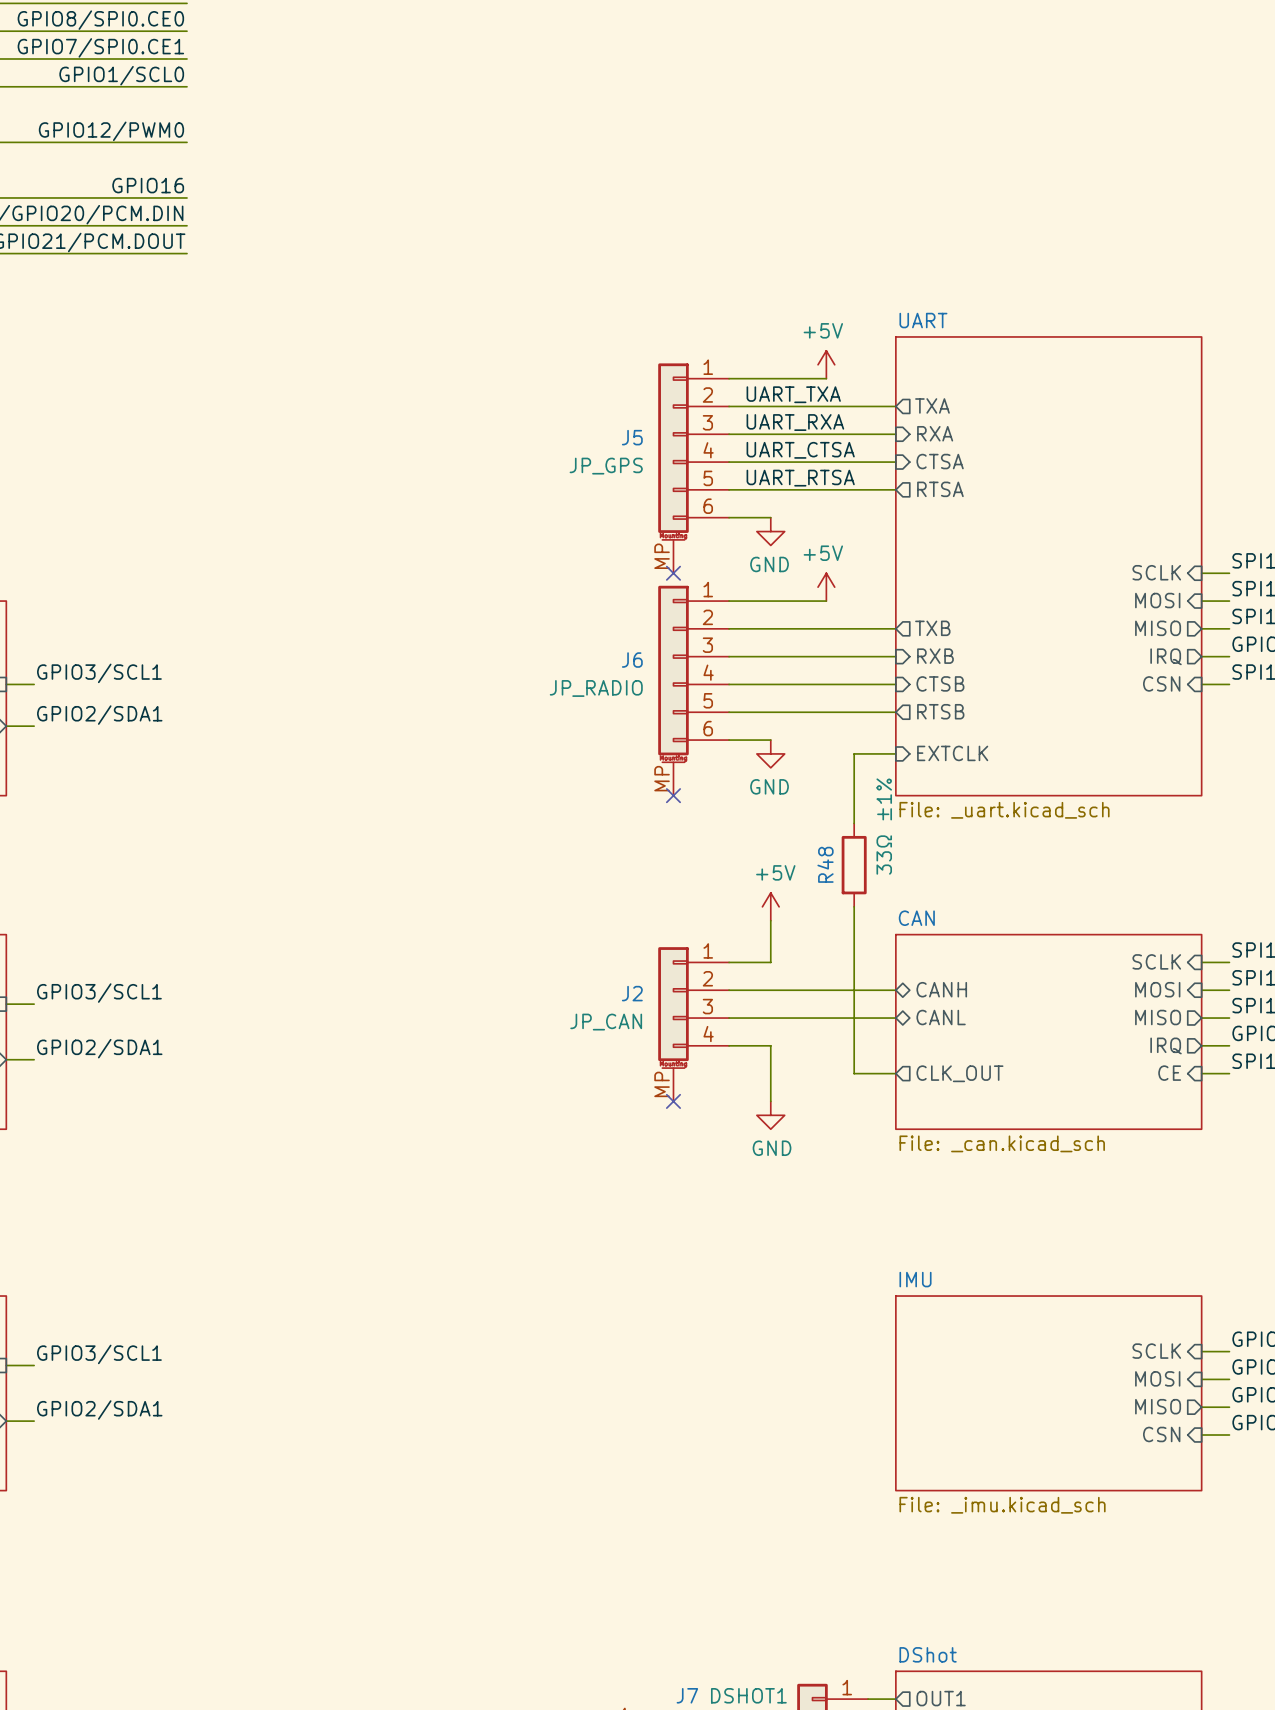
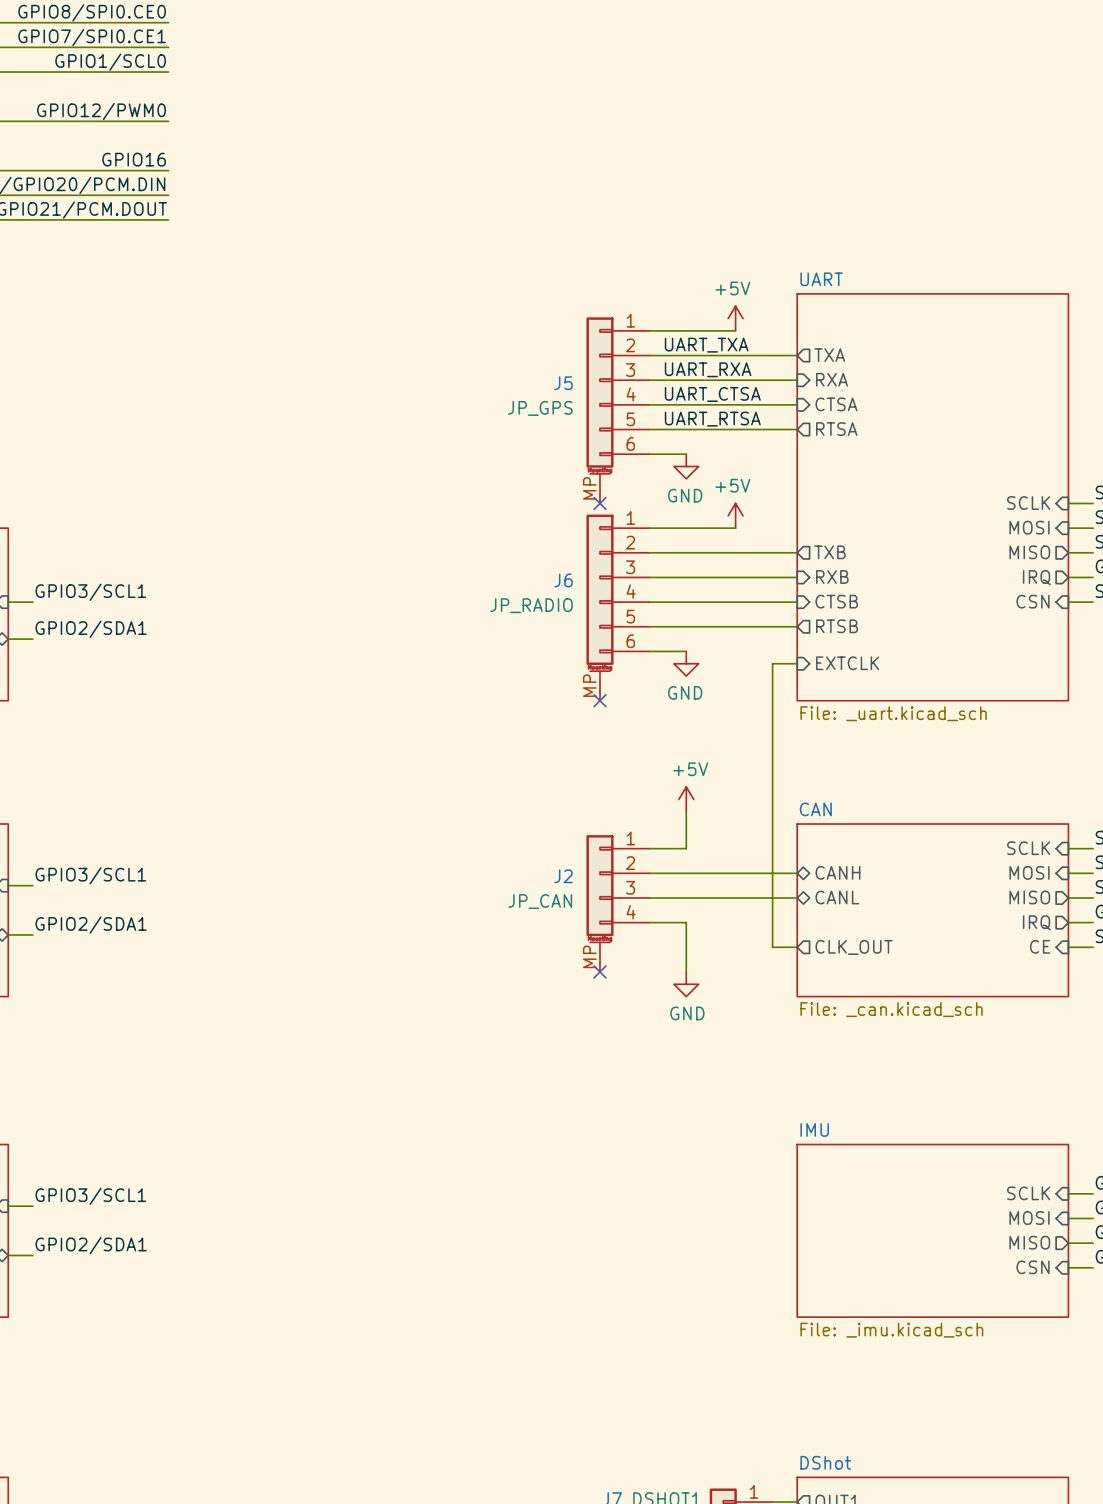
wire: (868, 753) (854, 753) (854, 823) -> none
R48: 33Ω ±1% (854, 865) -> none
wire: (854, 906) (854, 1073) (868, 1073) -> (772, 663) (772, 947)

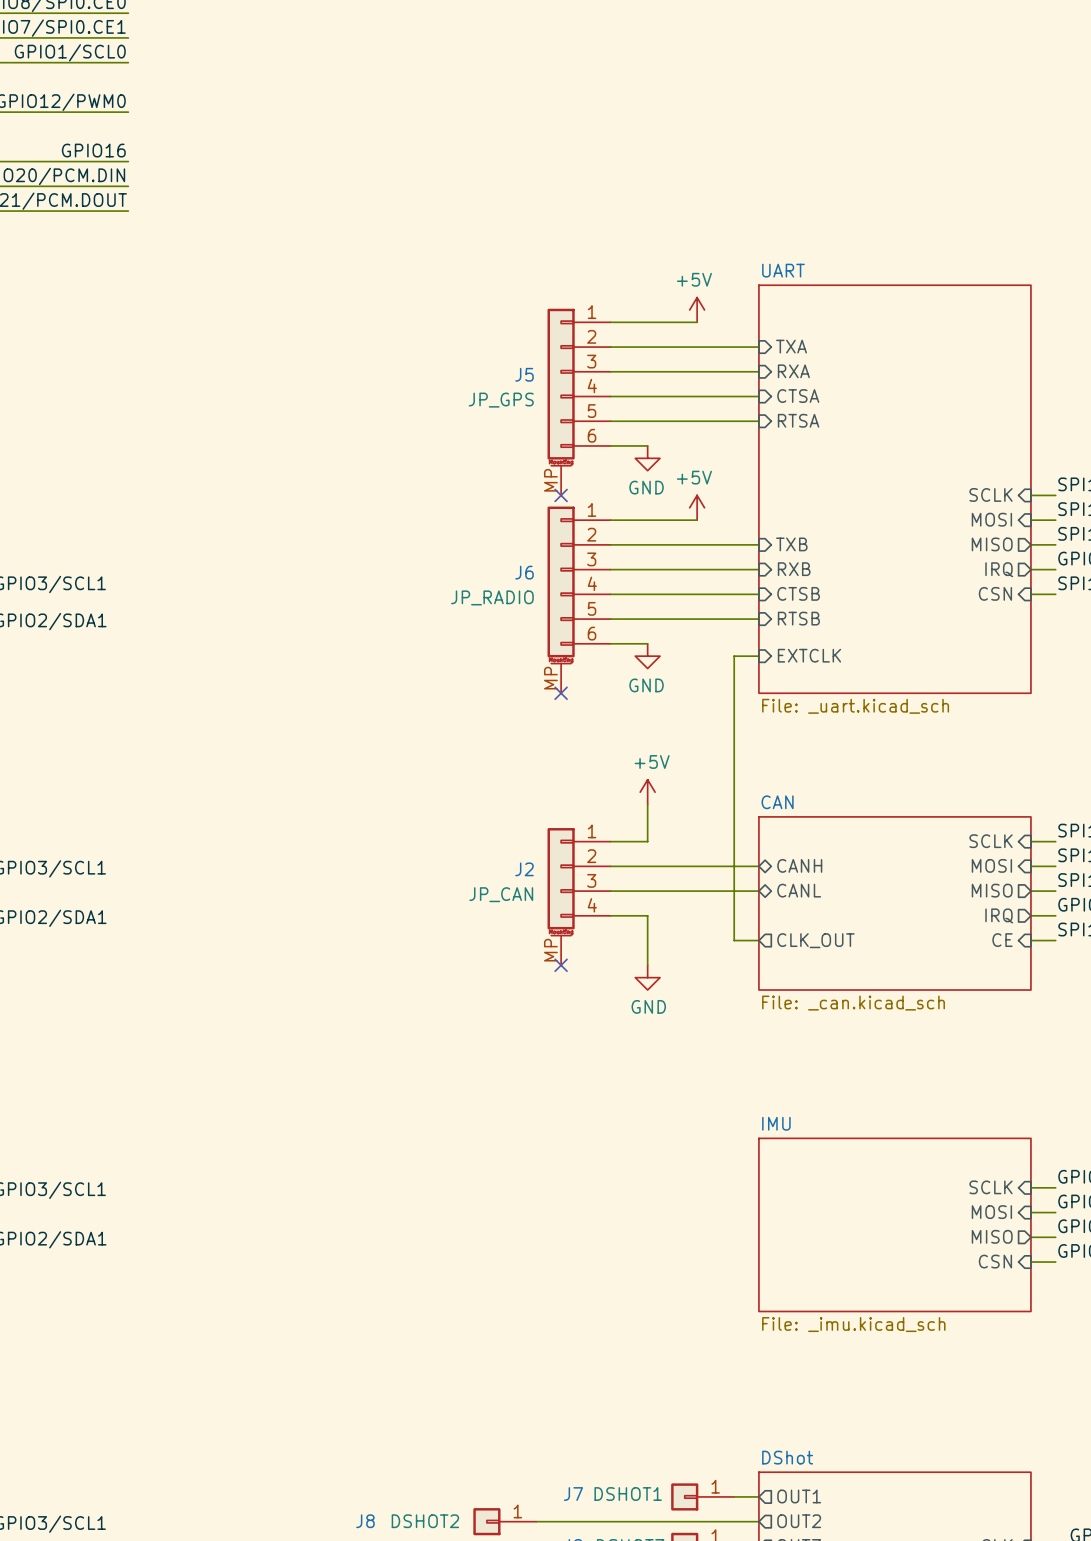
label: UART_TXA (706, 345) -> none
sheet pin shape: output (829, 355) -> input (791, 346)
label: UART_RXA (708, 369) -> none
label: UART_CTSA (712, 394) -> none
label: UART_RTSA (712, 419) -> none
sheet pin shape: output (836, 429) -> input (798, 420)
sheet pin shape: output (830, 552) -> input (791, 544)
sheet pin shape: output (837, 626) -> input (798, 618)

